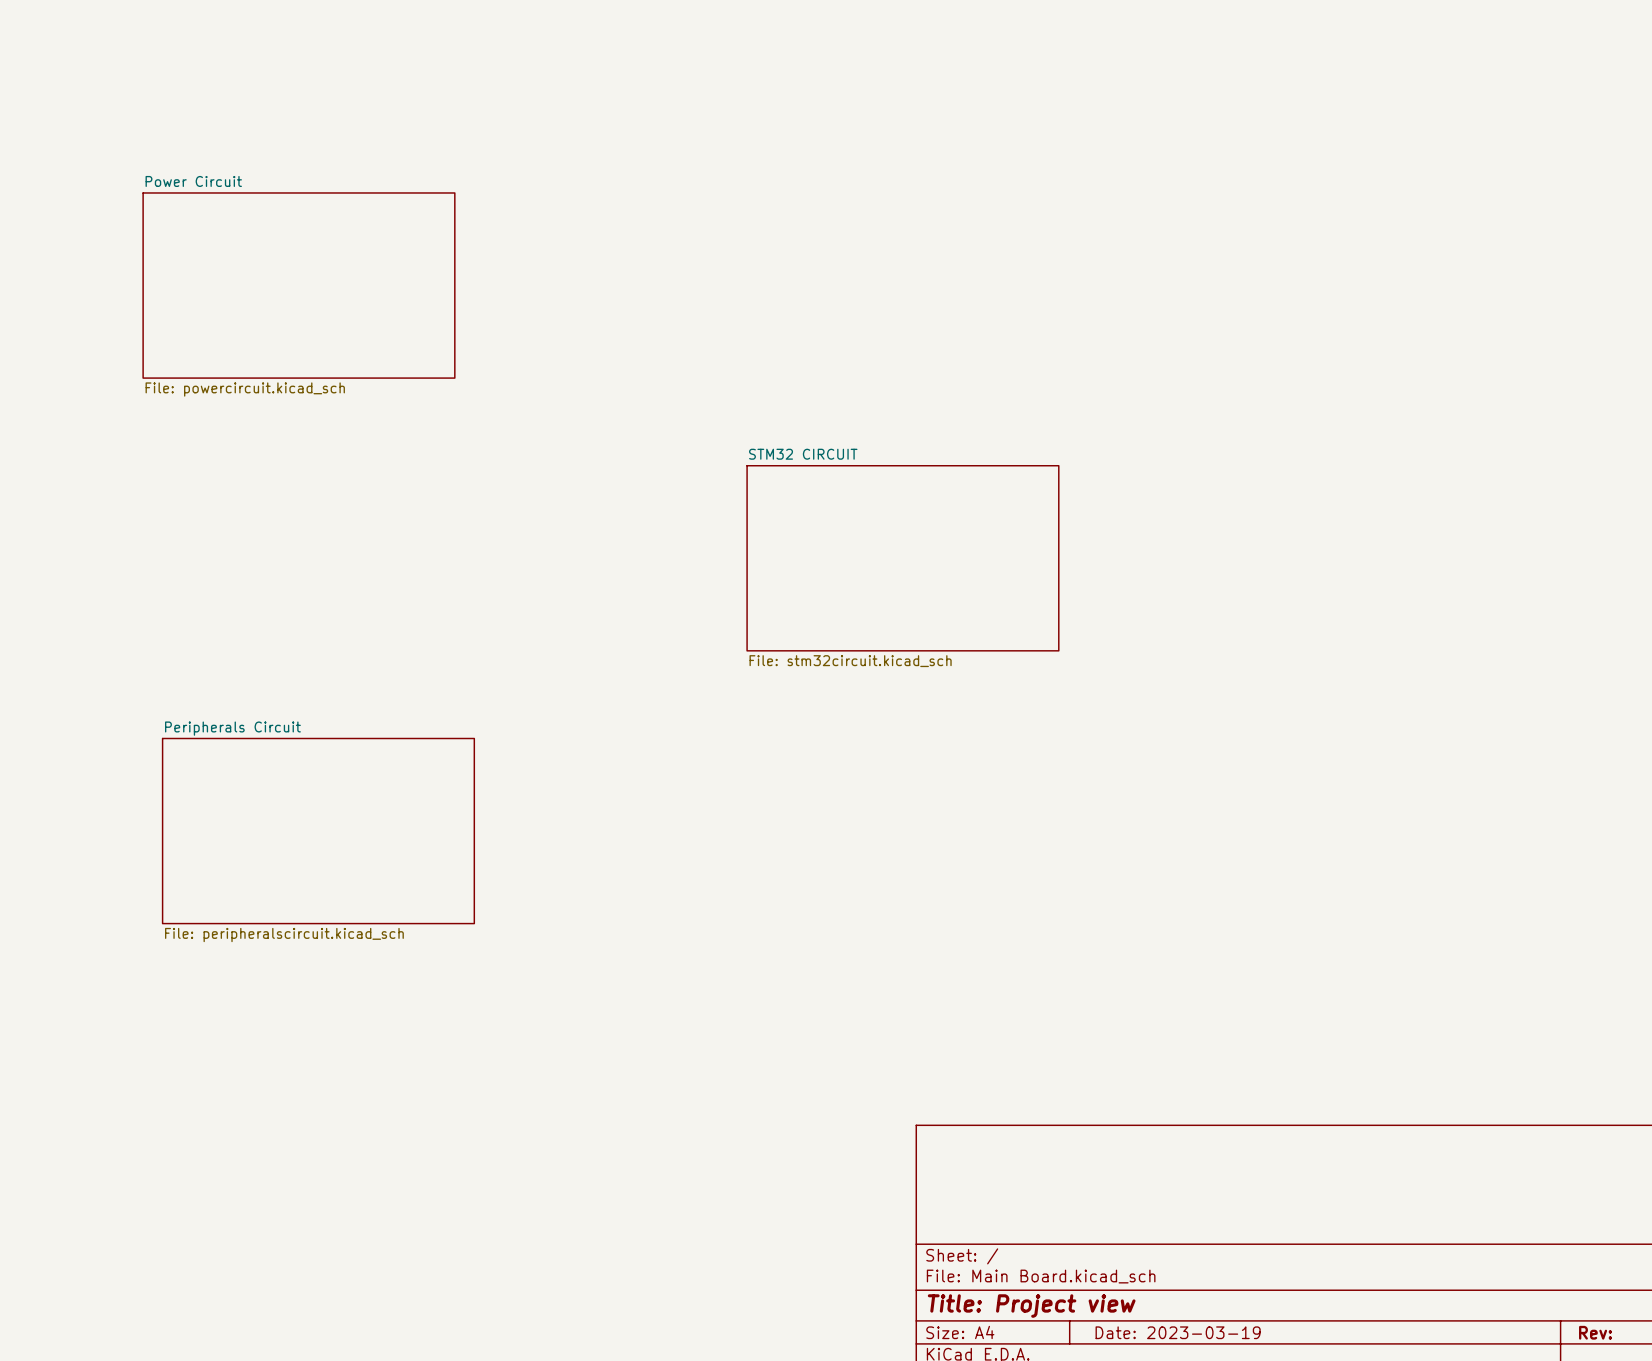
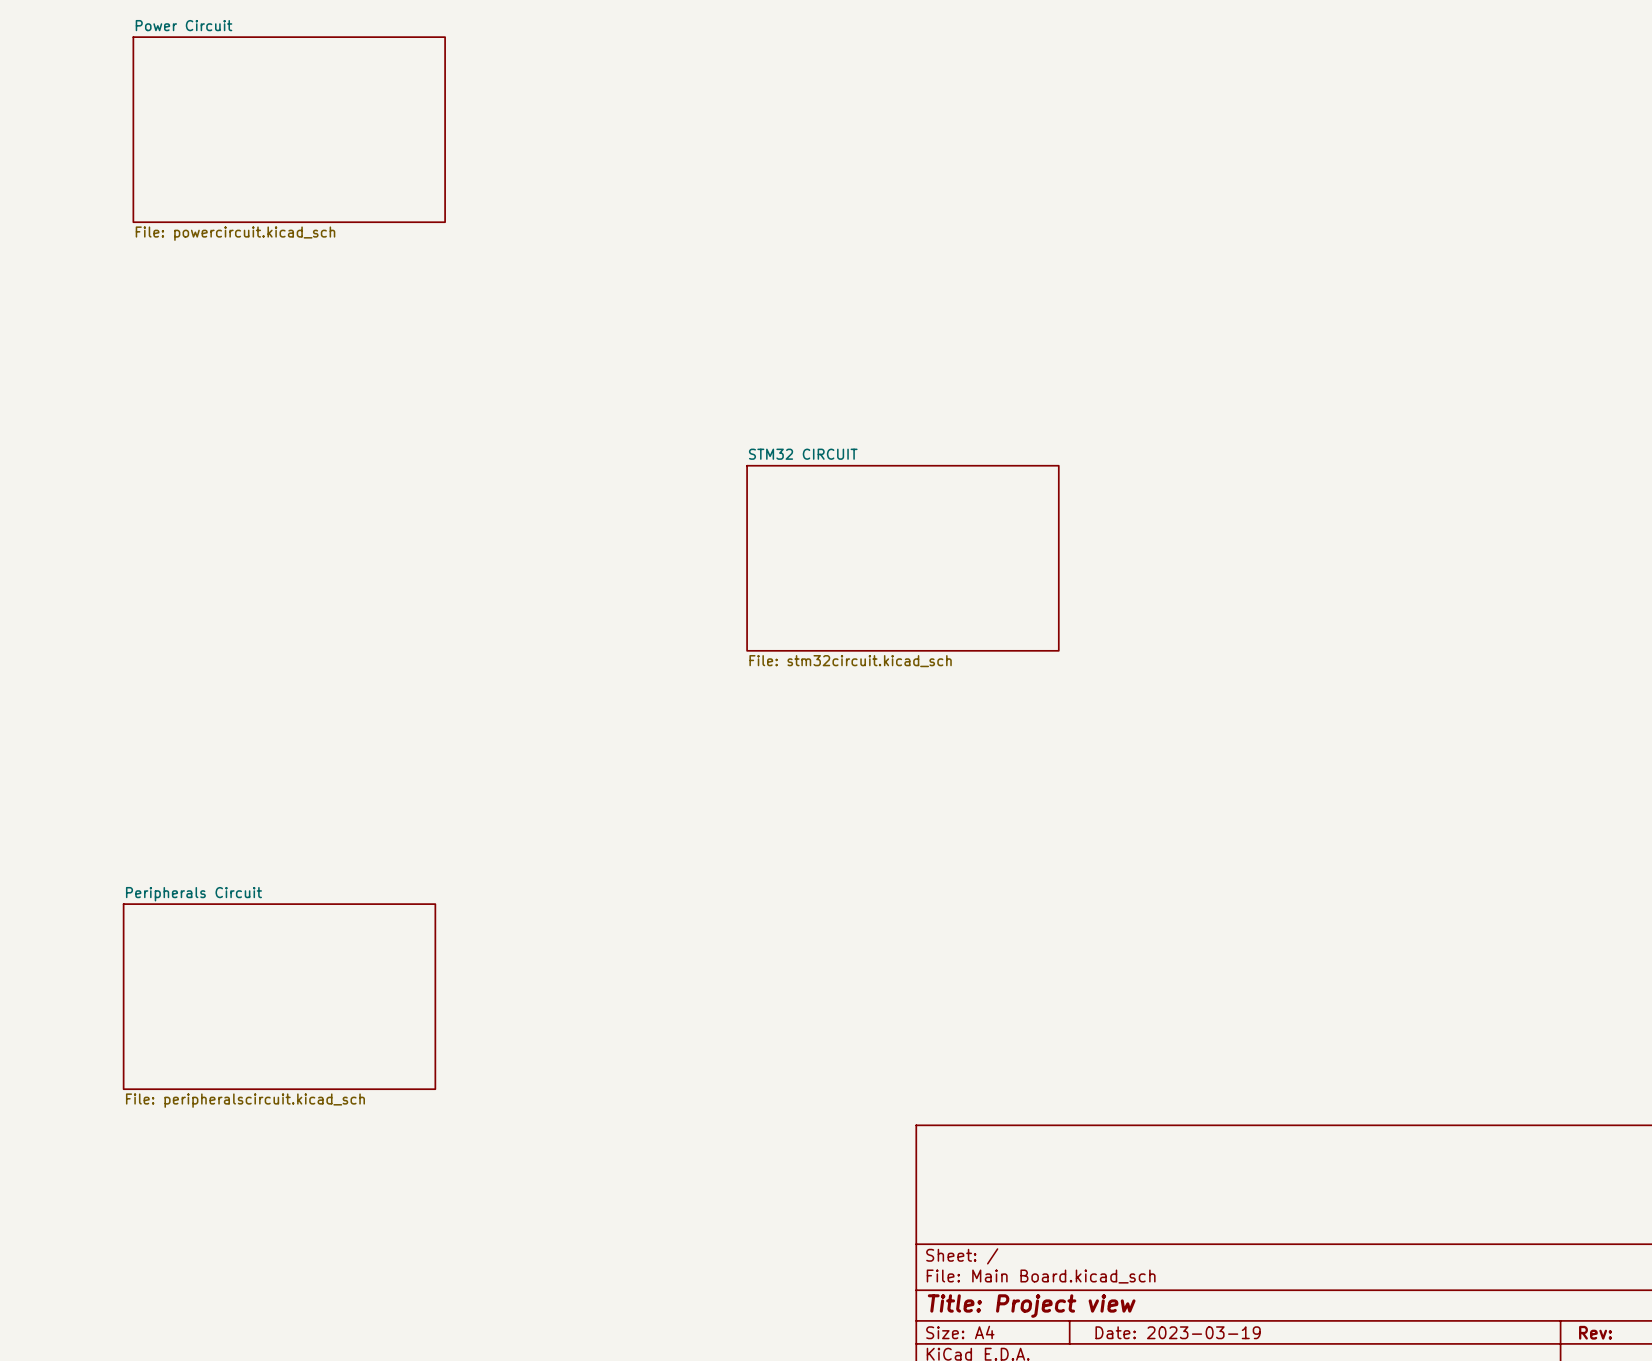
sheet Power Circuit position: (298, 285) -> (289, 129)
sheet Peripherals Circuit position: (318, 831) -> (279, 996)

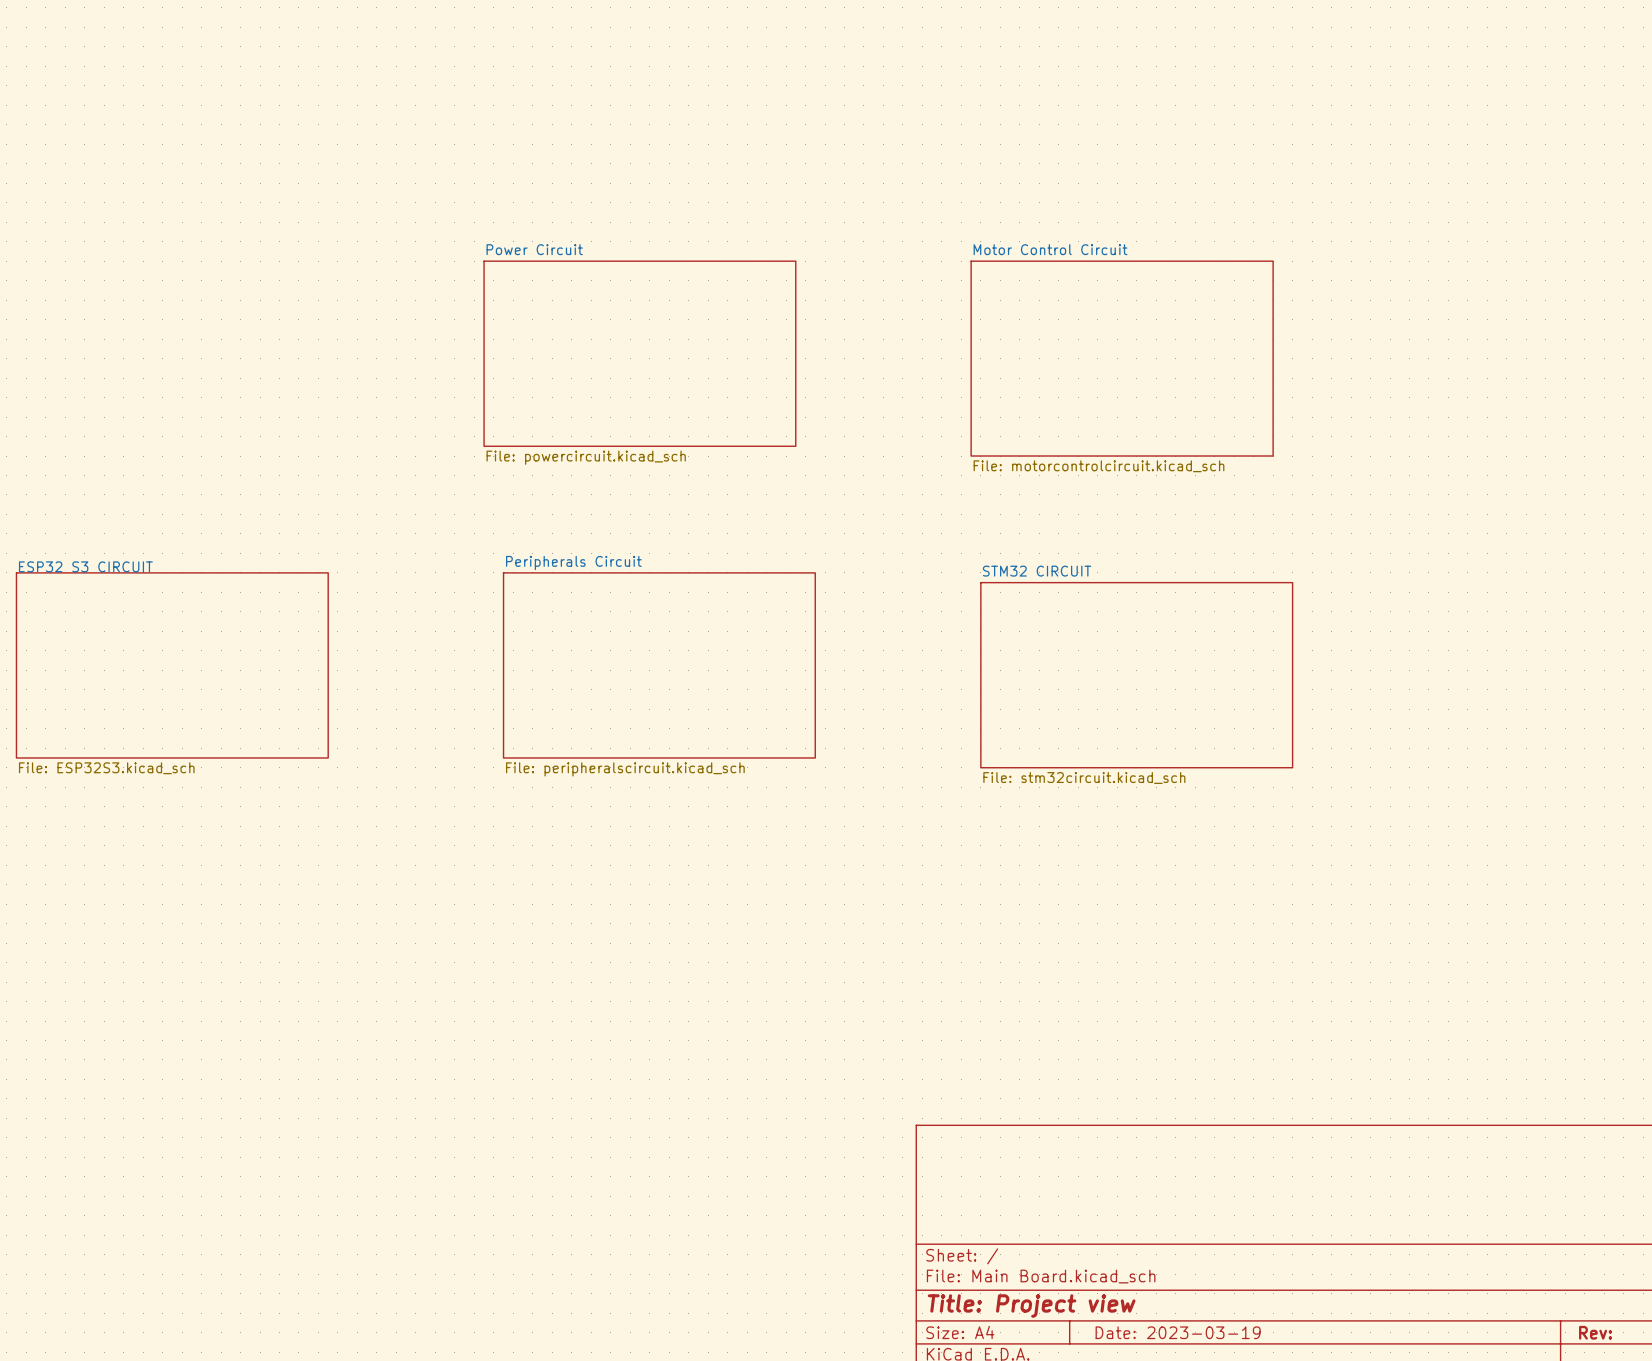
sheet Power Circuit: File: powercircuit.kicad_sch (289, 129) -> none
sheet Power Circuit: none -> File: powercircuit.kicad_sch (639, 353)
sheet Motor Control Circuit: none -> File: motorcontrolcircuit.kicad_sch (1122, 358)
sheet STM32 CIRCUIT position: (902, 558) -> (1136, 675)
sheet ESP32 S3 CIRCUIT: none -> File: ESP32S3.kicad_sch (172, 665)
sheet Peripherals Circuit: none -> File: peripheralscircuit.kicad_sch (659, 665)
sheet Peripherals Circuit: File: peripheralscircuit.kicad_sch (279, 996) -> none

